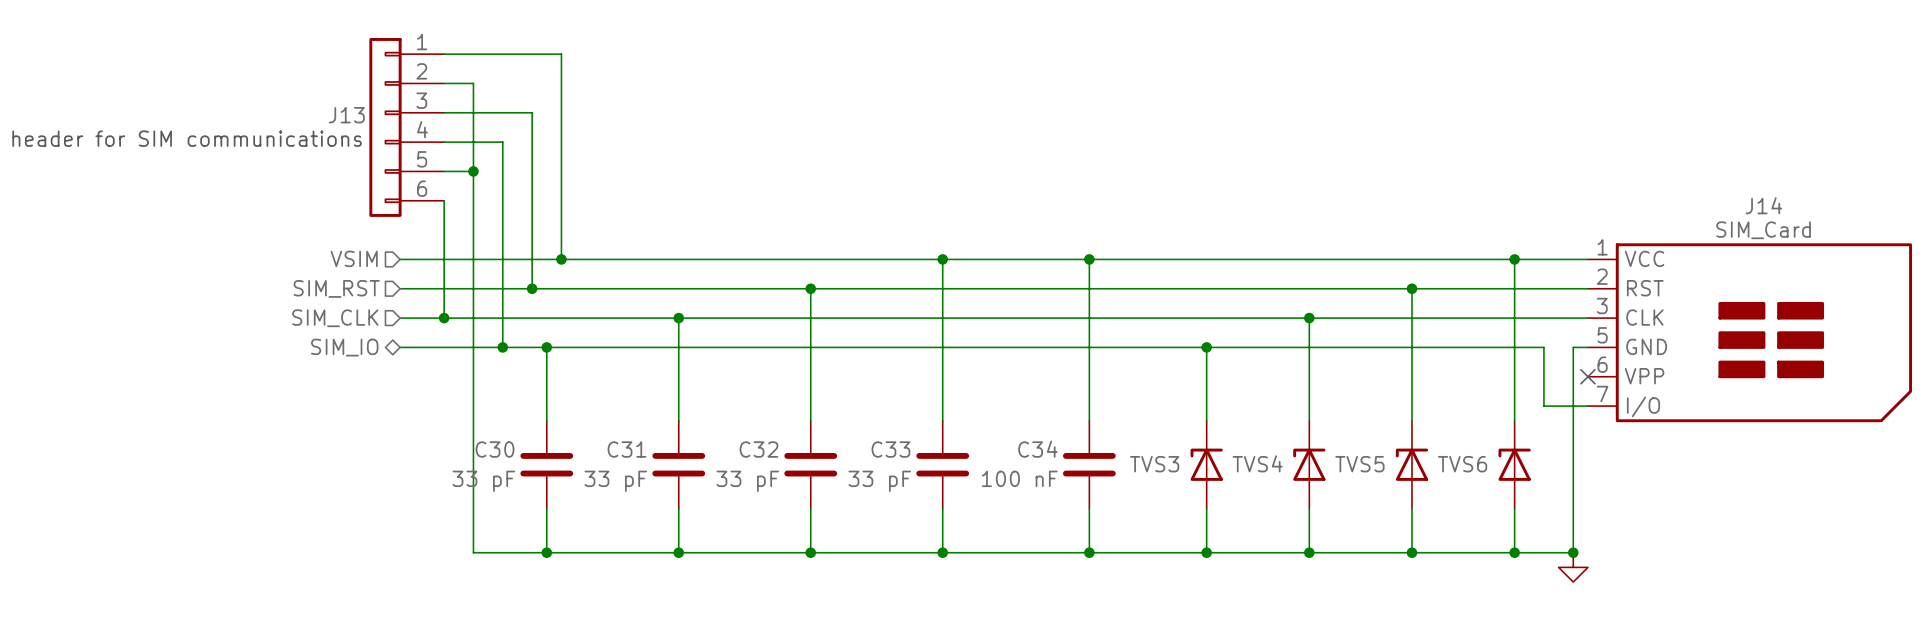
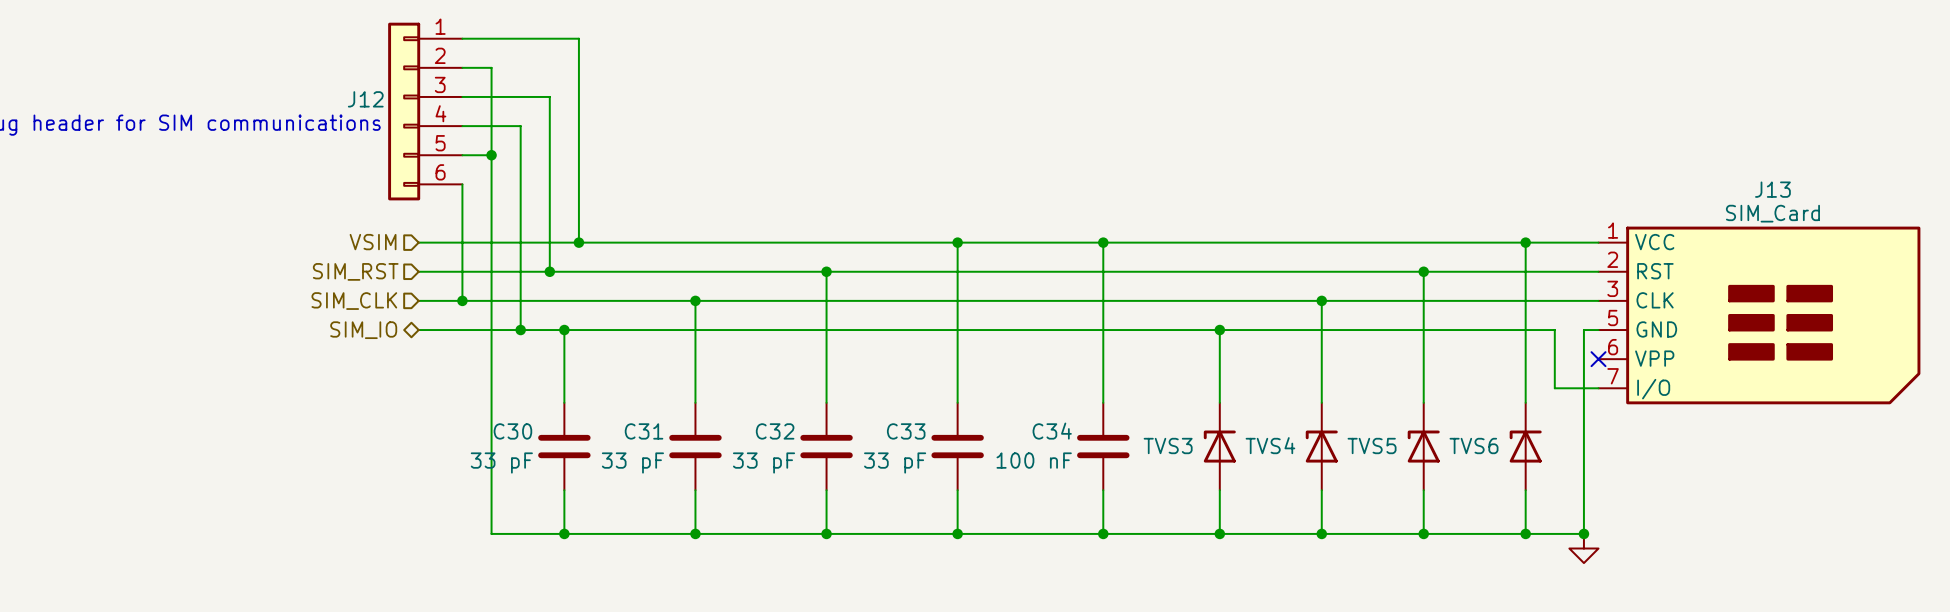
J13 name: J13 (346, 115) -> J12 (365, 99)
J14 name: J14 (1763, 205) -> J13 (1772, 189)

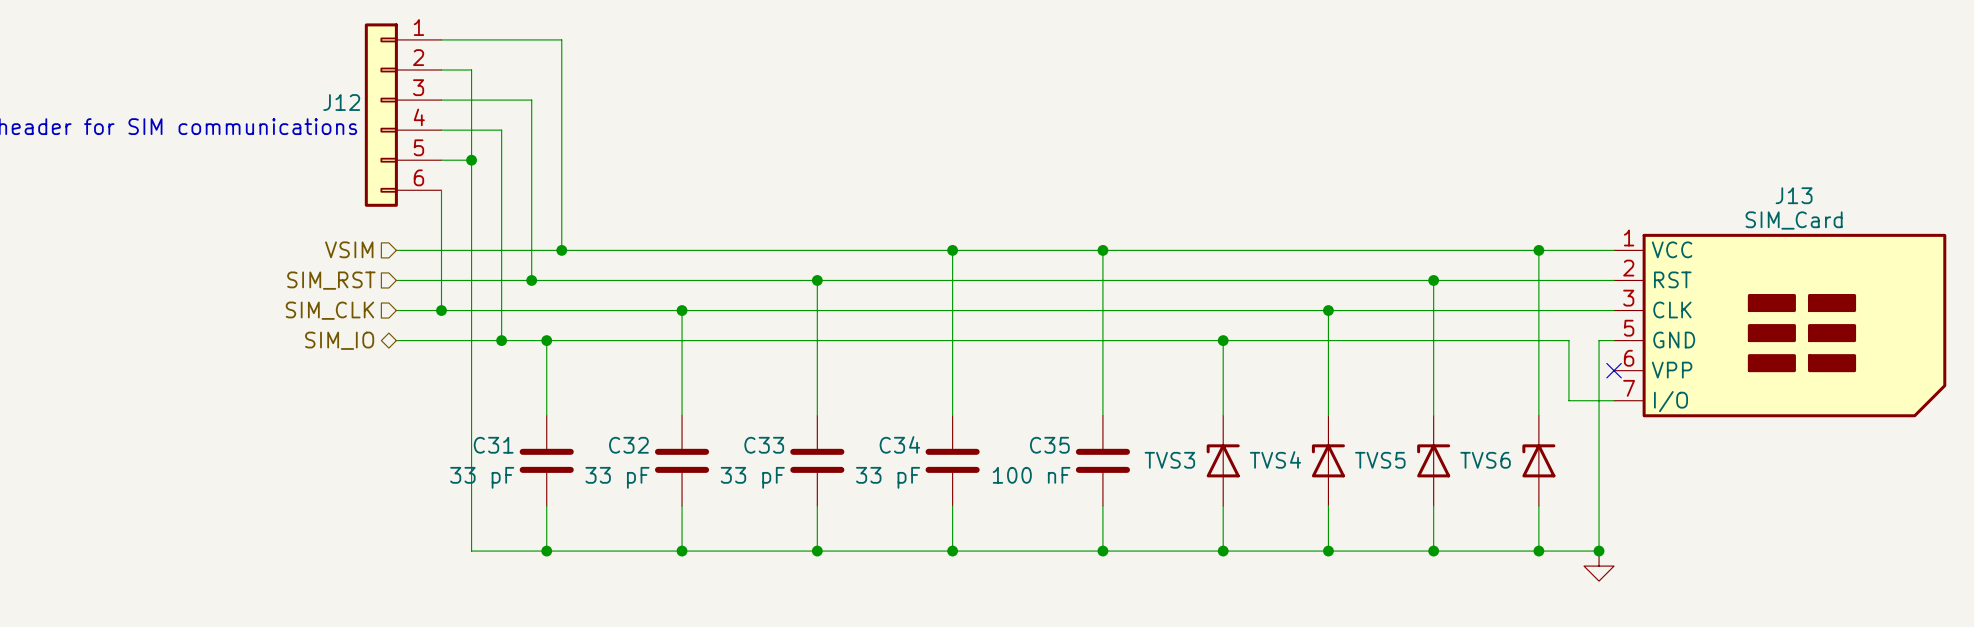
C30 name: C30 (512, 431) -> C31 (493, 445)
C31 name: C31 (644, 431) -> C32 (628, 445)
C32 name: C32 (775, 431) -> C33 (764, 445)
C33 name: C33 (906, 431) -> C34 (899, 444)
C34 name: C34 (1052, 431) -> C35 (1049, 445)

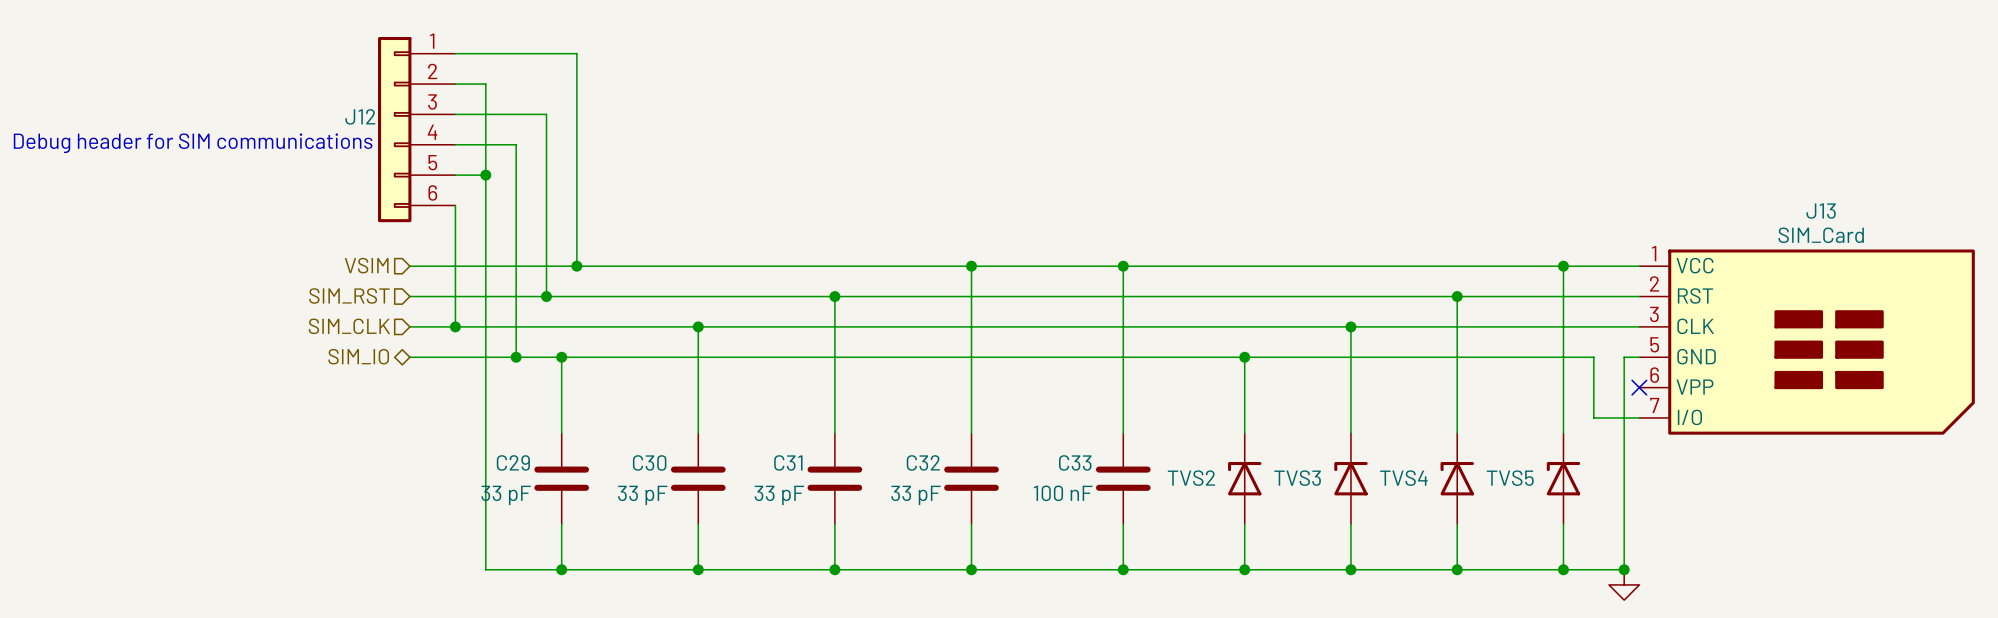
C34 name: C34 (899, 444) -> C32 (923, 462)
C31 name: C31 (493, 445) -> C29 (513, 462)
C32 name: C32 (628, 445) -> C30 (649, 462)
C33 name: C33 (764, 445) -> C31 (788, 462)
C35 name: C35 (1049, 445) -> C33 (1075, 462)
TVS4 name: TVS4 (1275, 459) -> TVS3 (1297, 478)
TVS3 name: TVS3 (1169, 460) -> TVS2 (1191, 478)
TVS5 name: TVS5 (1380, 460) -> TVS4 (1403, 478)
TVS6 name: TVS6 (1485, 460) -> TVS5 (1510, 478)

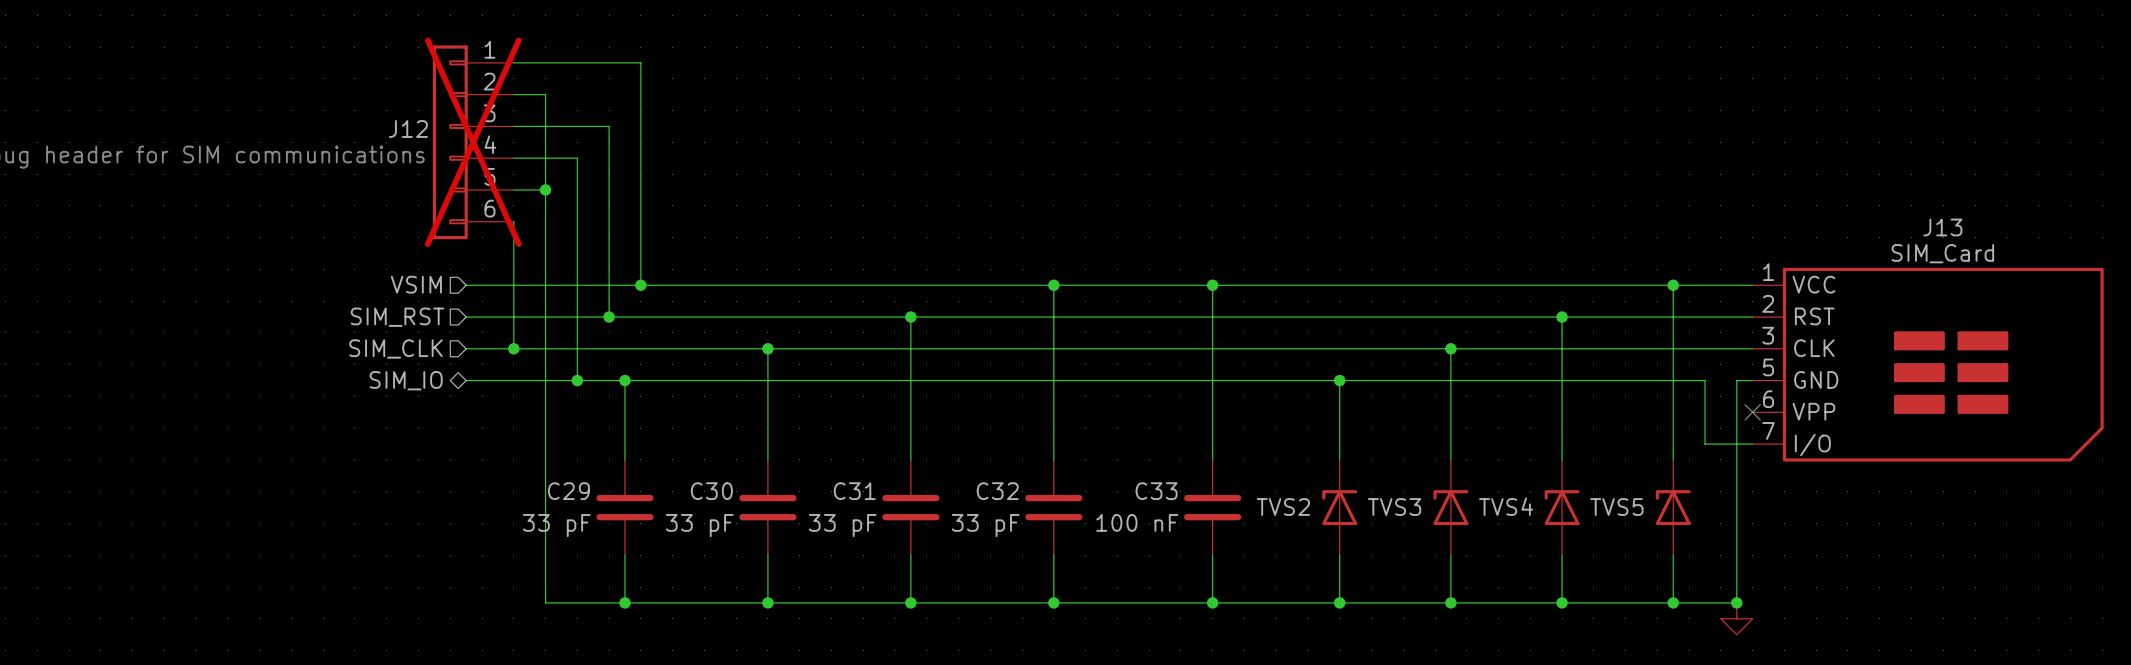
J12 do-not-place cross: none -> (473, 142)

